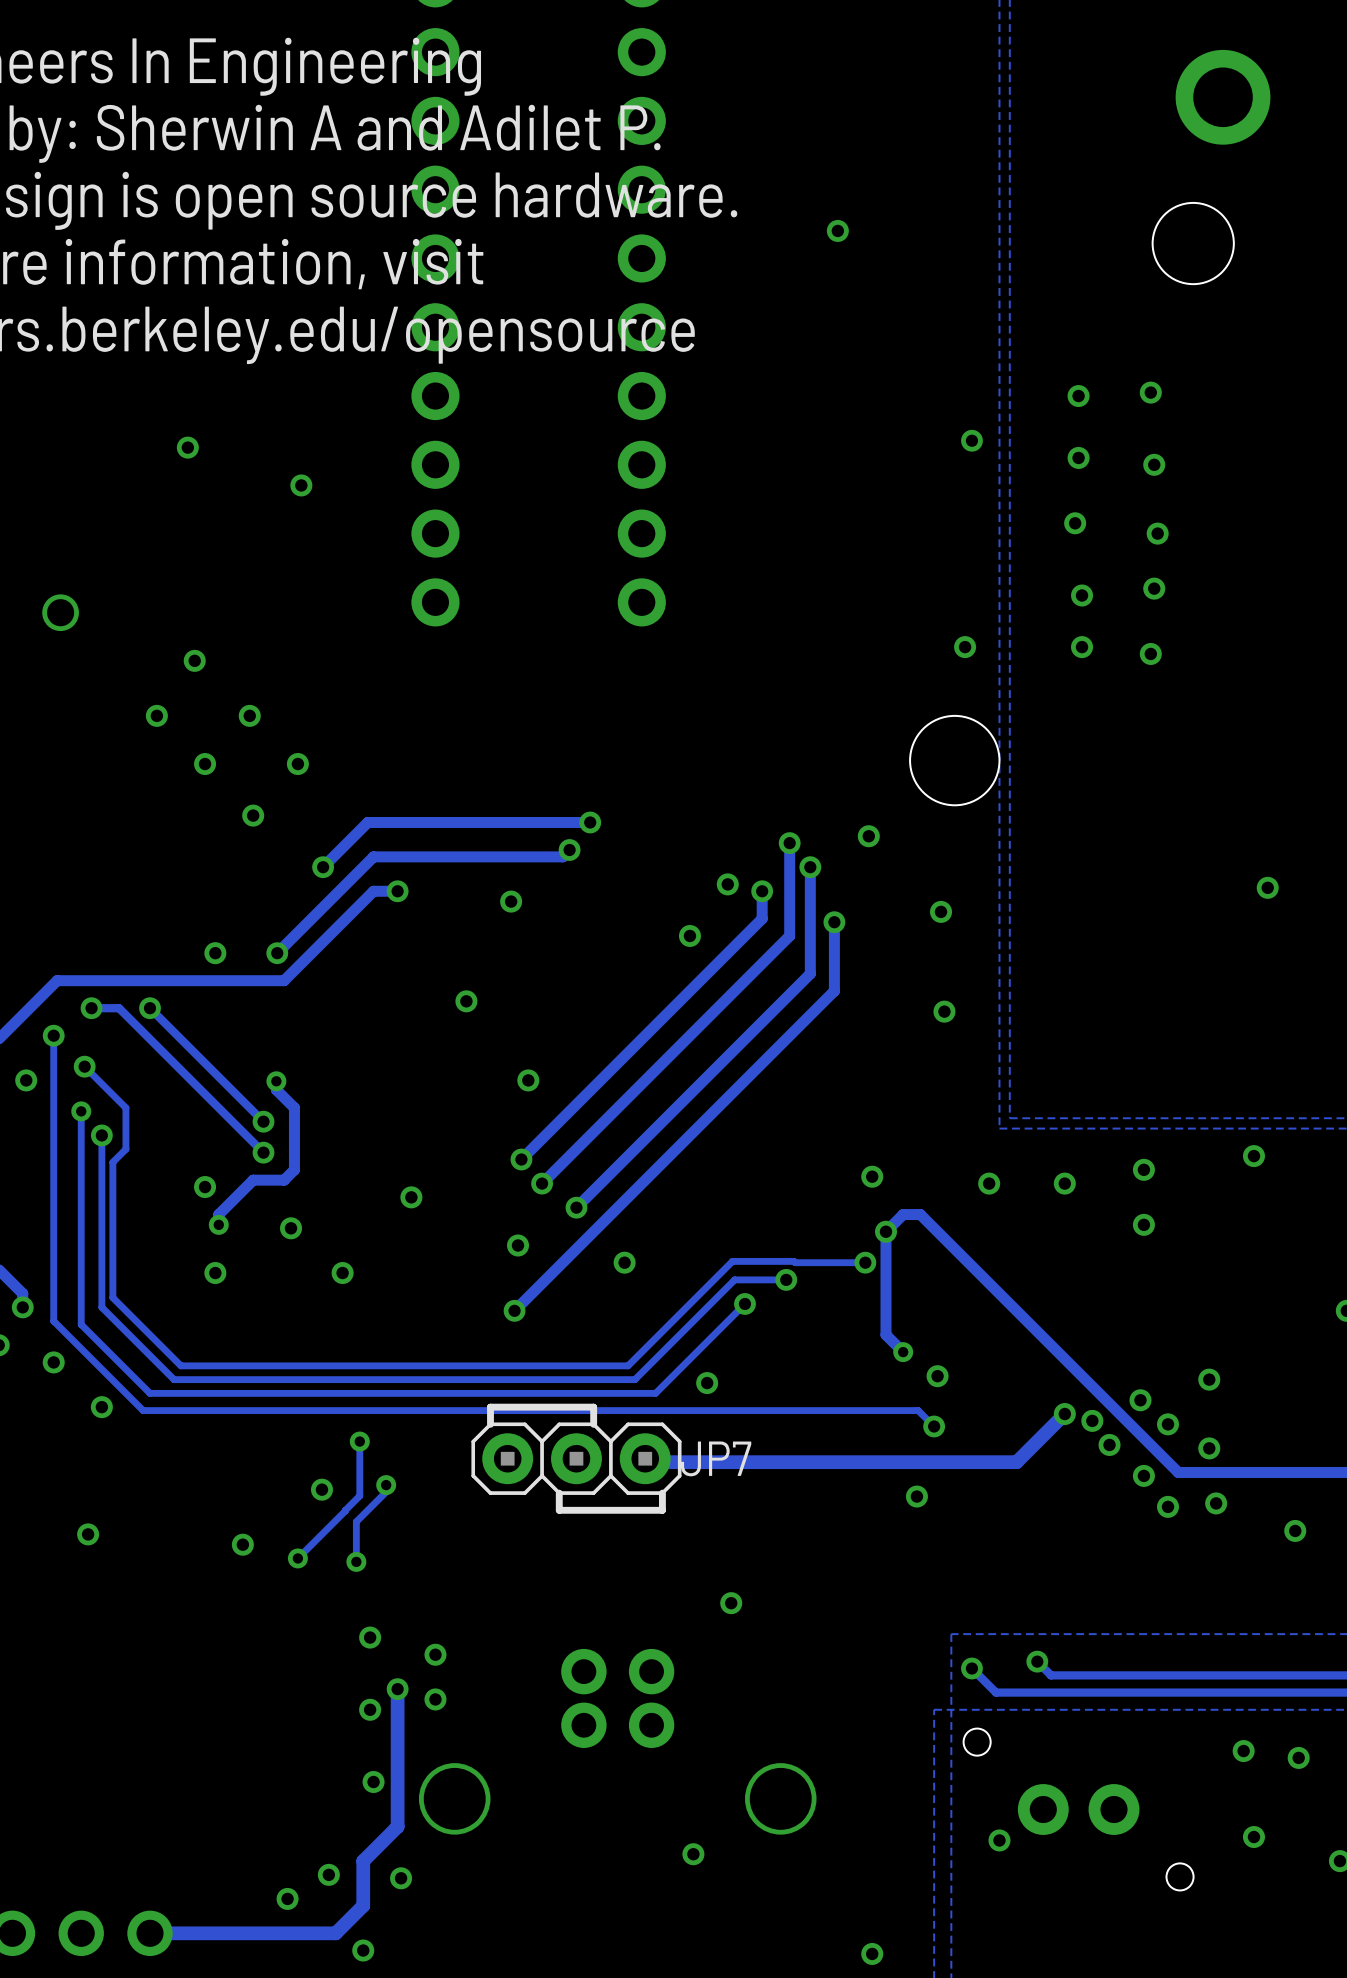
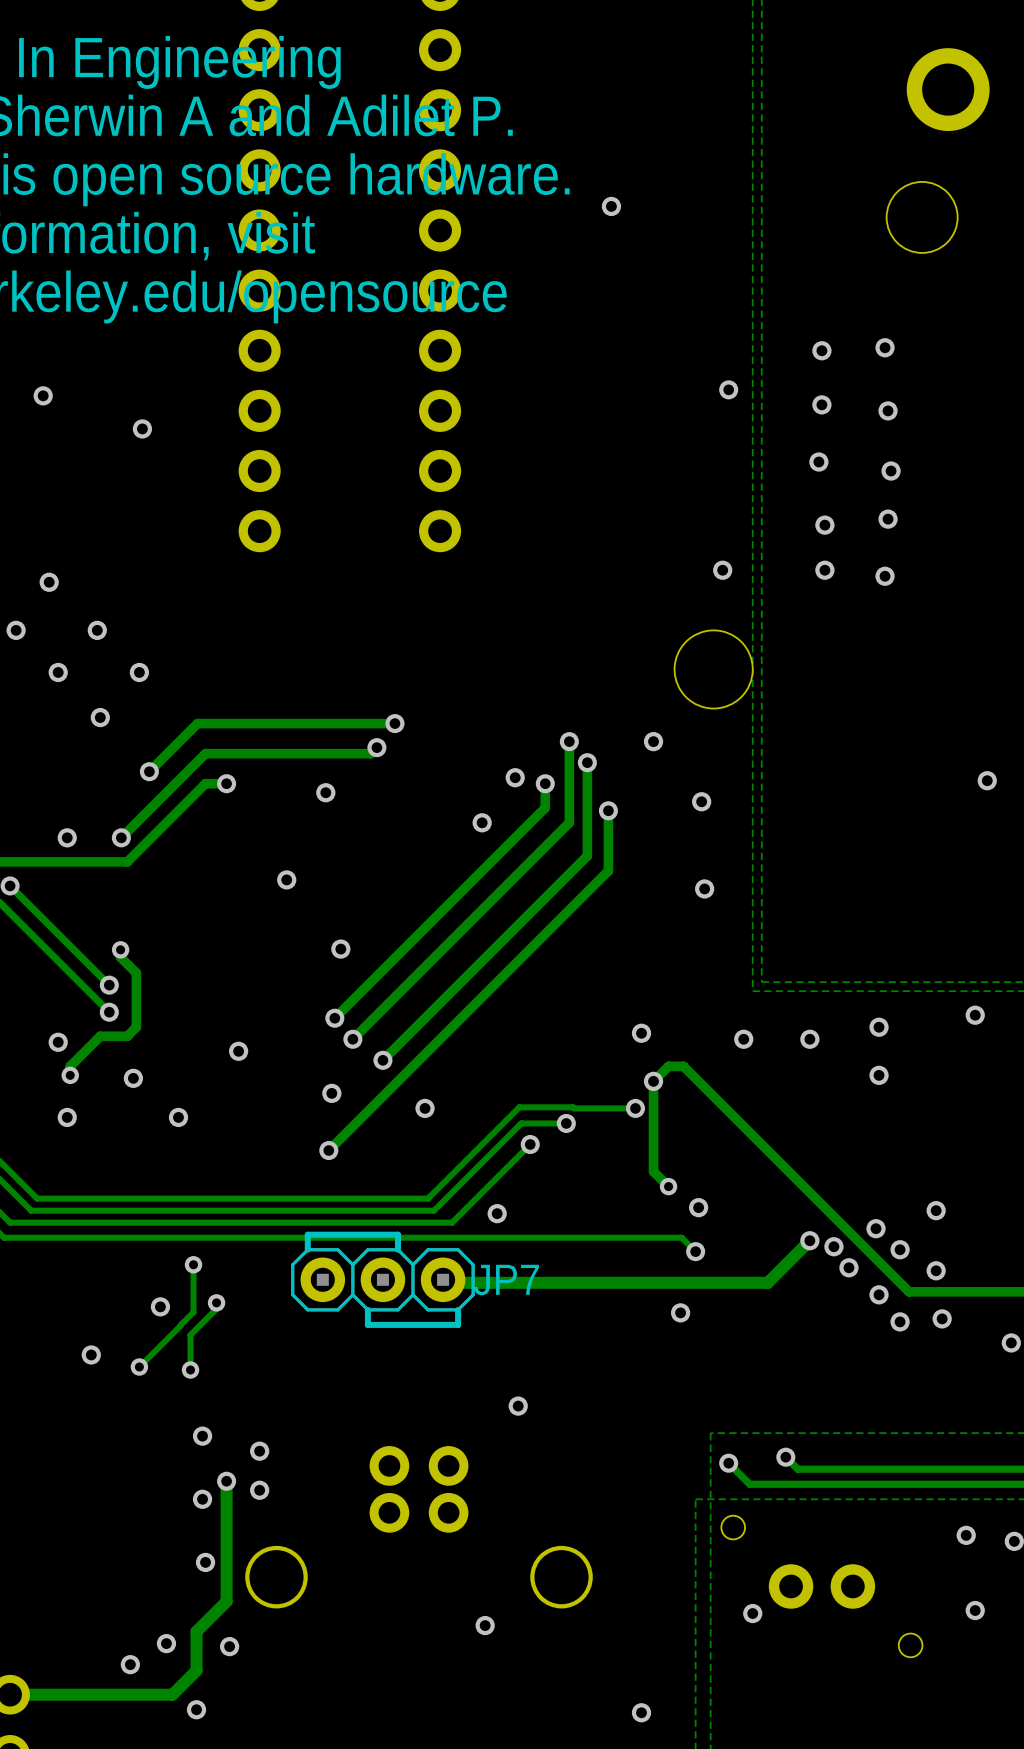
track: (367, 822) (323, 867) -> (200, 723) (197, 723) (149, 771)
via position: (868, 836) -> (653, 741)
via position: (323, 867) -> (149, 771)

